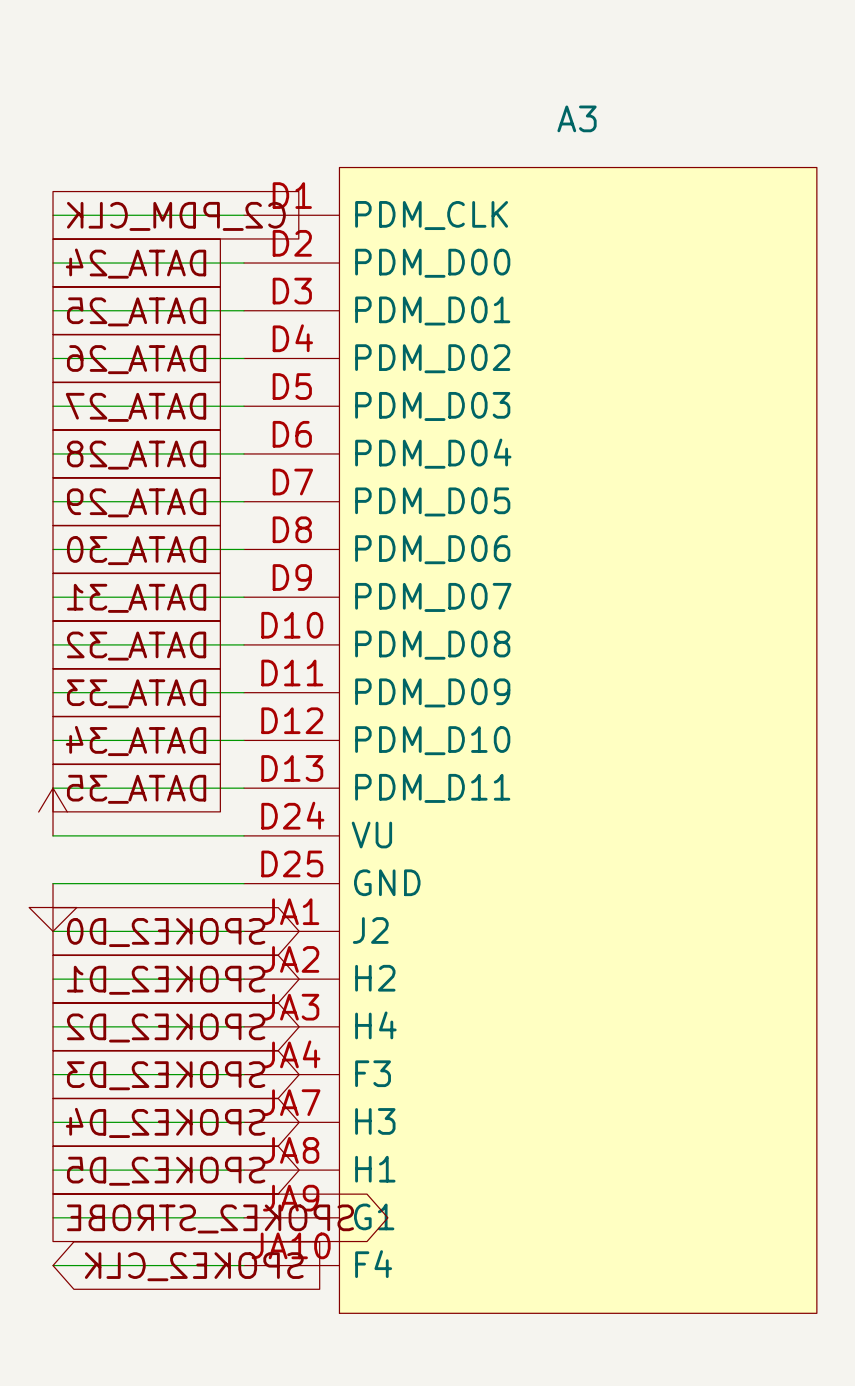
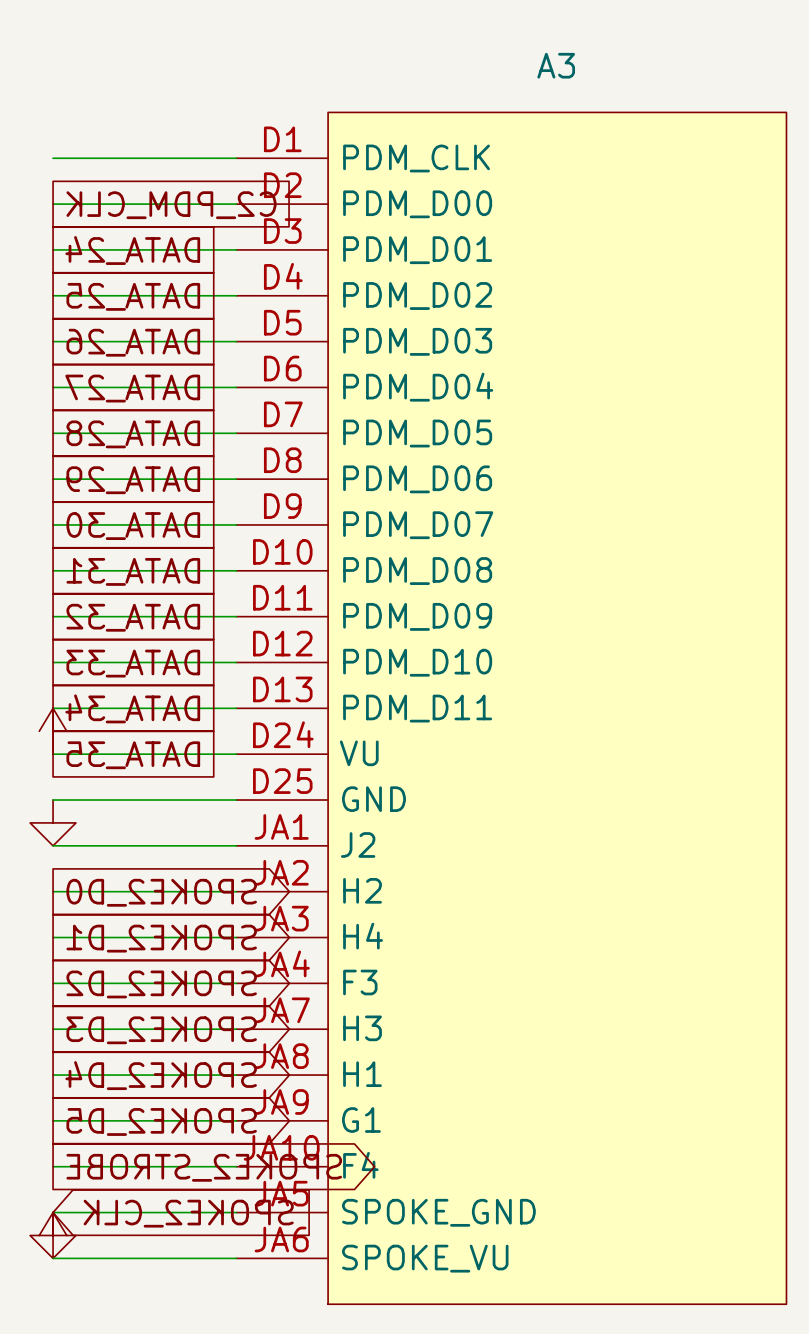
A3 name position: A3 (577, 118) -> A3 (556, 65)
wire: none -> (53, 158) (236, 158)
A3 symbol: [243, 167, 817, 1314] -> [236, 112, 787, 1305]
power symbol position: (53, 812) -> (53, 731)
power symbol position: (53, 907) -> (53, 822)
power symbol: none -> (53, 1235)
power symbol: none -> (53, 1235)
wire: none -> (53, 1258) (236, 1258)

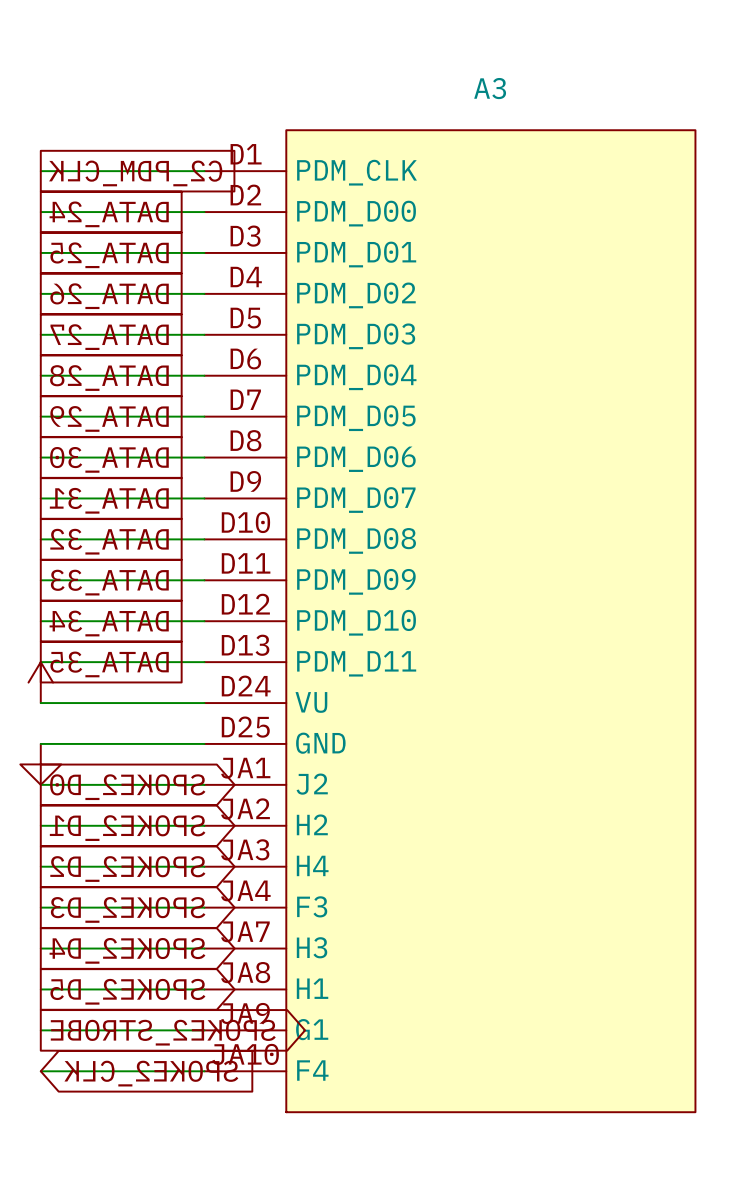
A3 name position: A3 (556, 65) -> A3 (490, 88)
A3 symbol: [236, 112, 787, 1305] -> [204, 130, 696, 1113]
wire: (53, 158) (236, 158) -> none
power symbol position: (53, 731) -> (40, 682)
power symbol position: (53, 822) -> (40, 764)
power symbol: (53, 1235) -> none
power symbol: (53, 1235) -> none
wire: (53, 1258) (236, 1258) -> none

